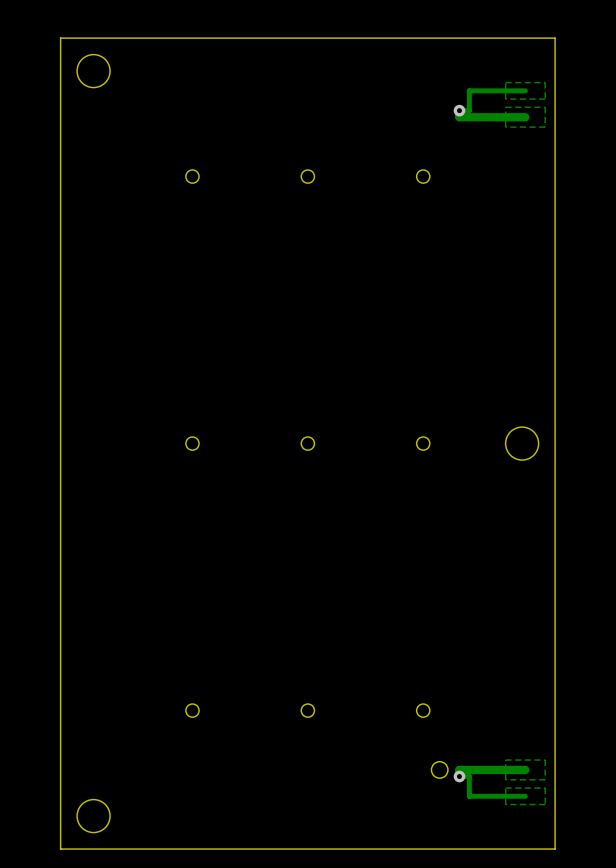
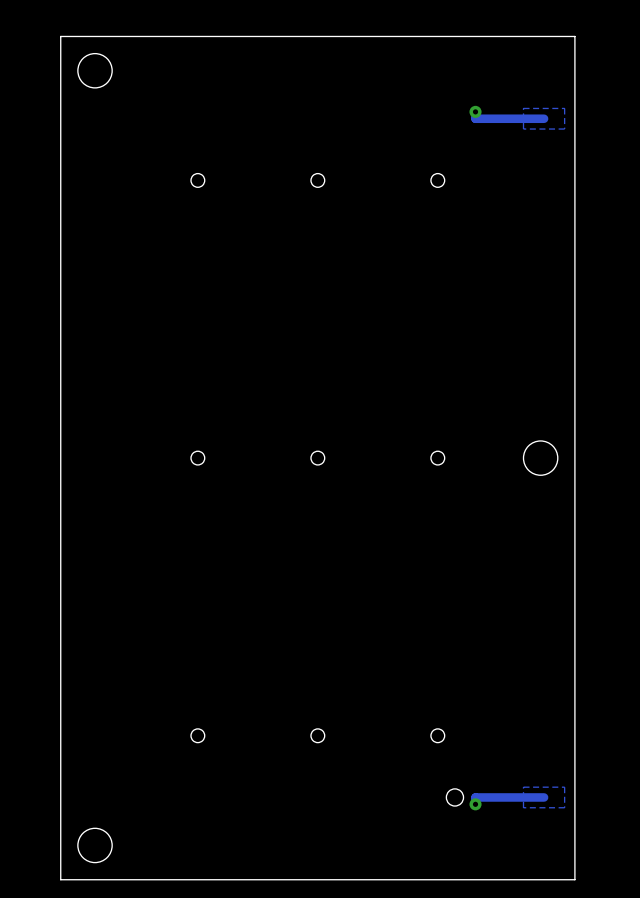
zone outline: (545, 82) (545, 99) (505, 99) (505, 82) (545, 82) -> none
track: (525, 90) (469, 90) (469, 110) (459, 110) -> none
track: (459, 776) (469, 776) (469, 796) (525, 796) -> none
zone outline: (545, 788) (545, 804) (505, 804) (505, 788) (545, 788) -> none

